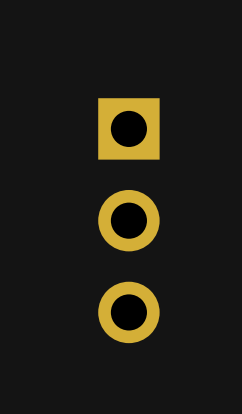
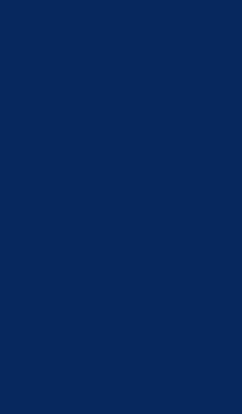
part: (128, 220) -> none

